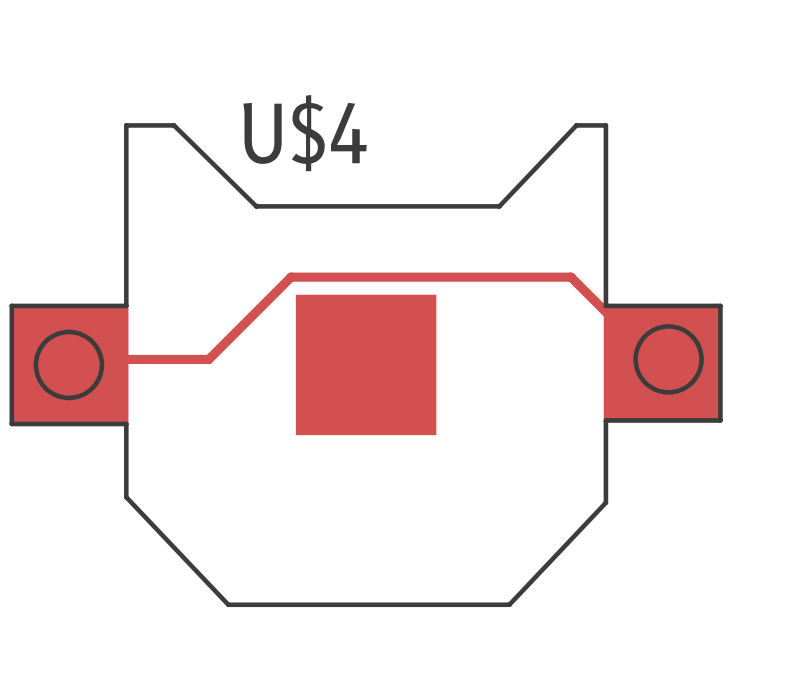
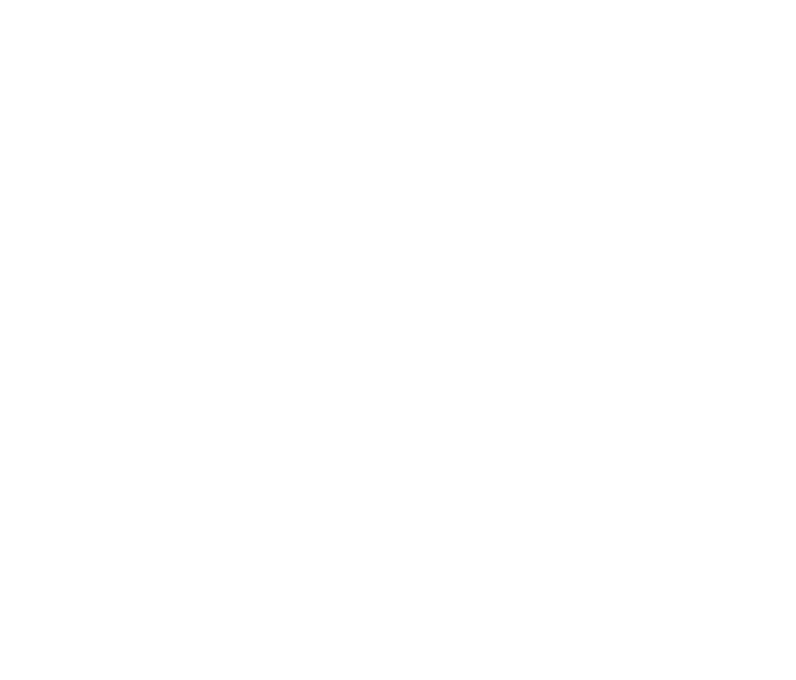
top track: (70, 364) (77, 359) (208, 359) (291, 277) (570, 277) (653, 359) (661, 364) -> none
U$4: (366, 365) -> none

